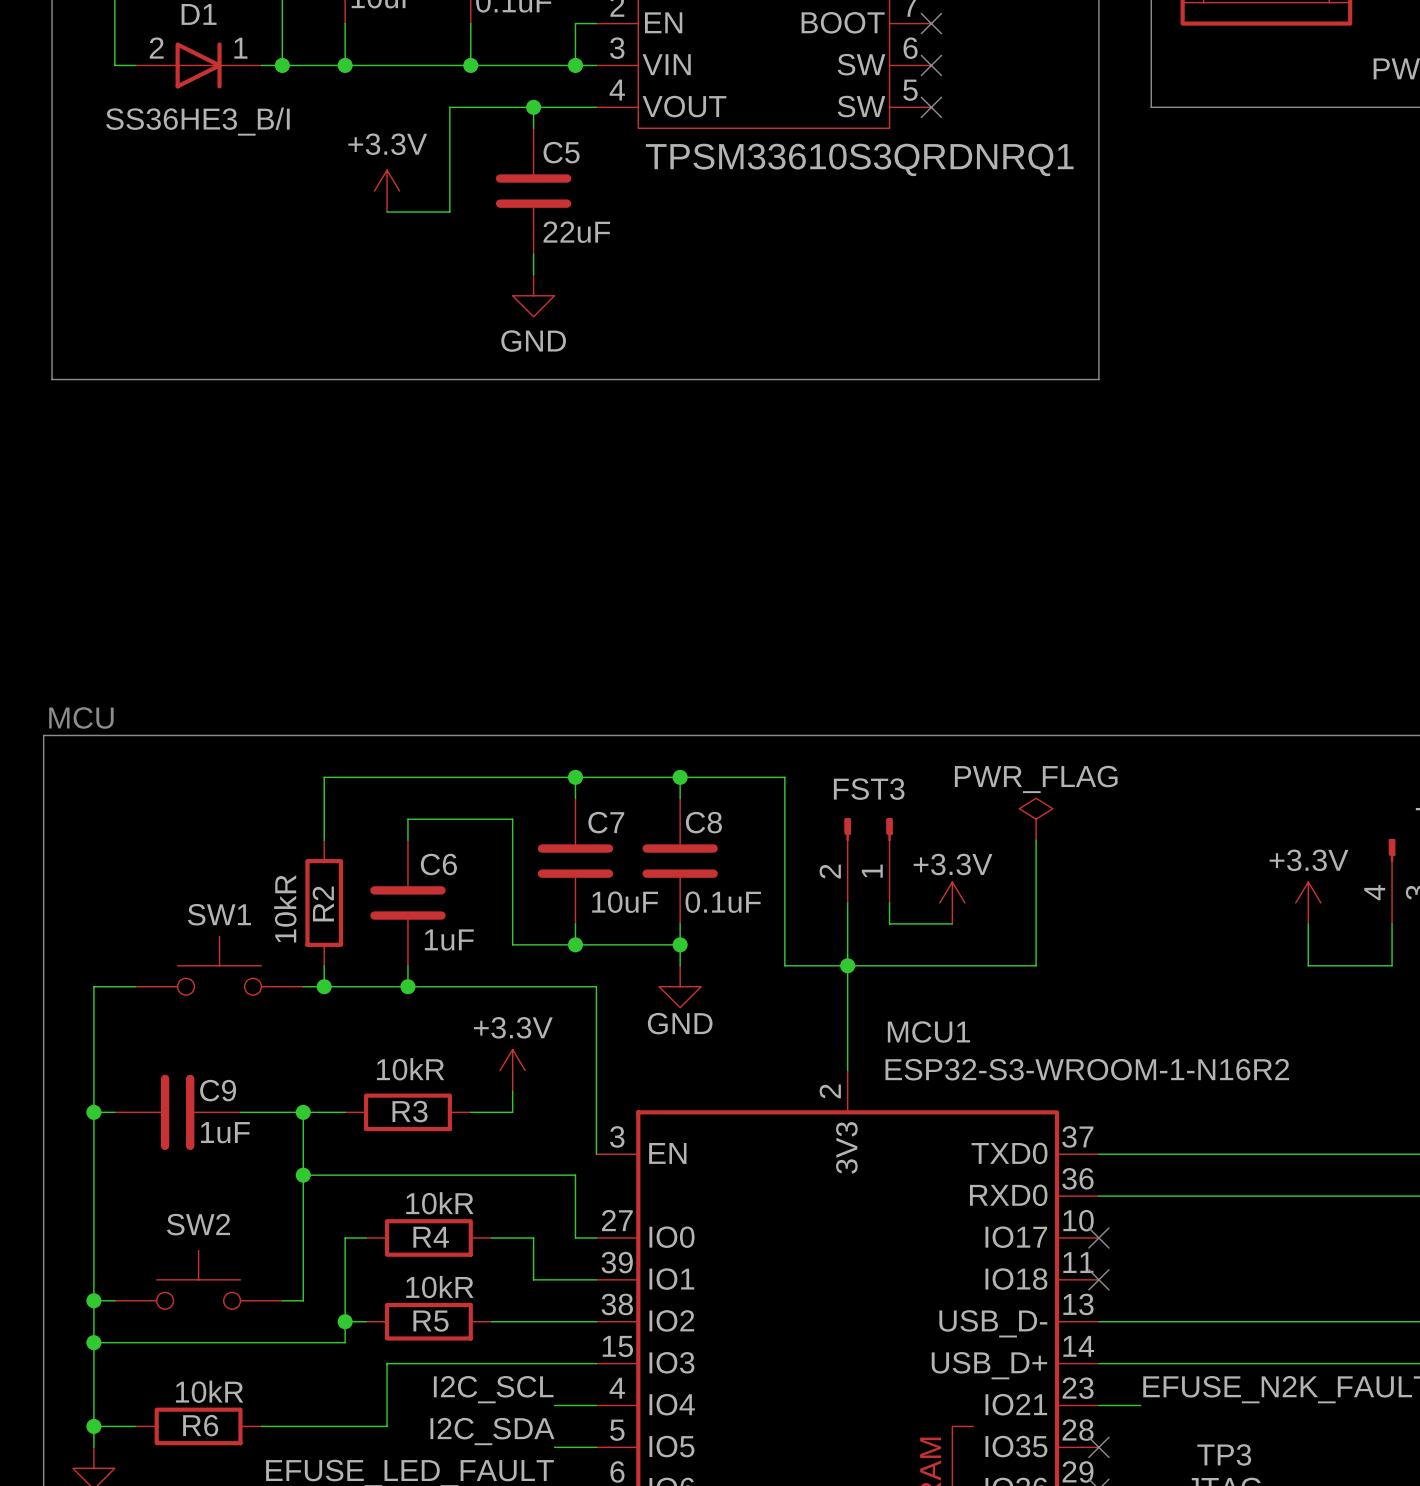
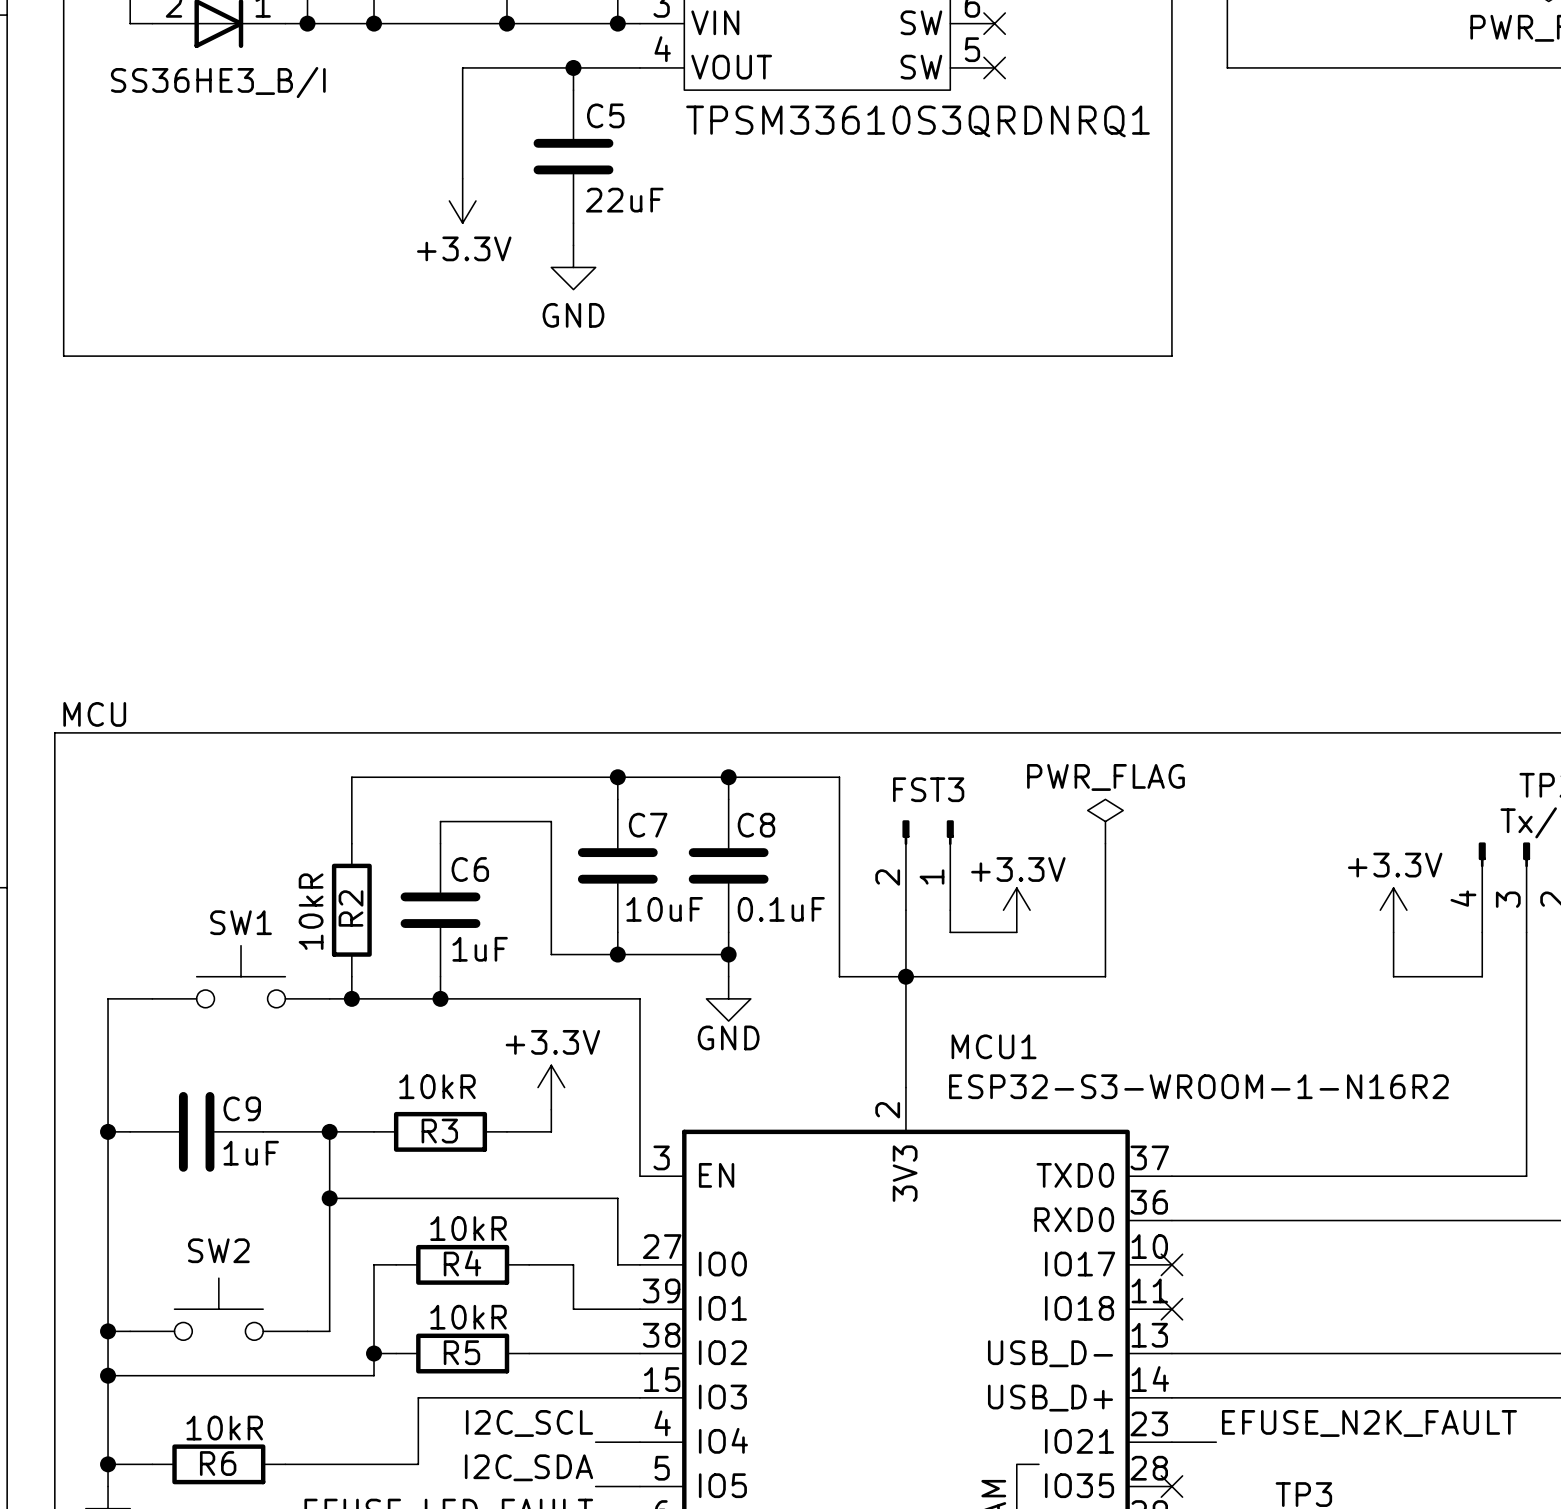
wire: (449, 107) (449, 212) (387, 212) -> (484, 67) (462, 67) (462, 178)
power symbol rotation: 0° (387, 191) -> 180° (462, 200)
power symbol position: +3.3V (387, 191) -> +3.3V (462, 200)

